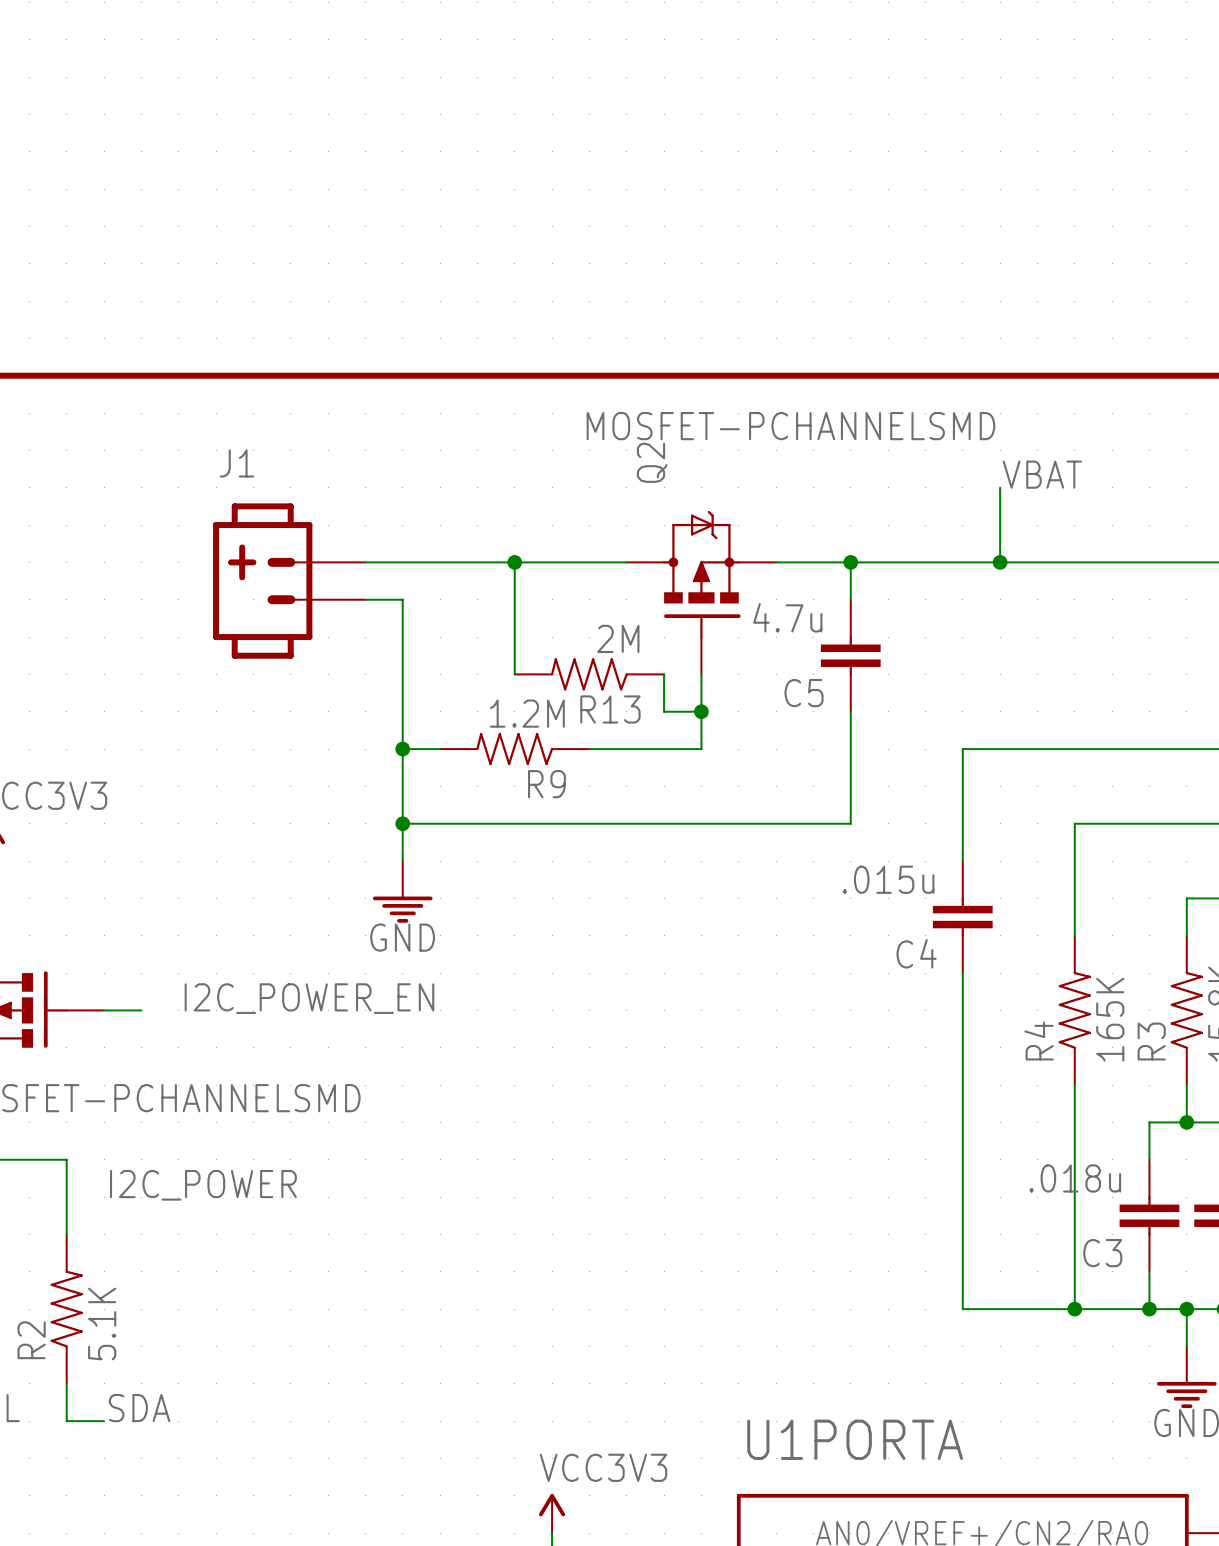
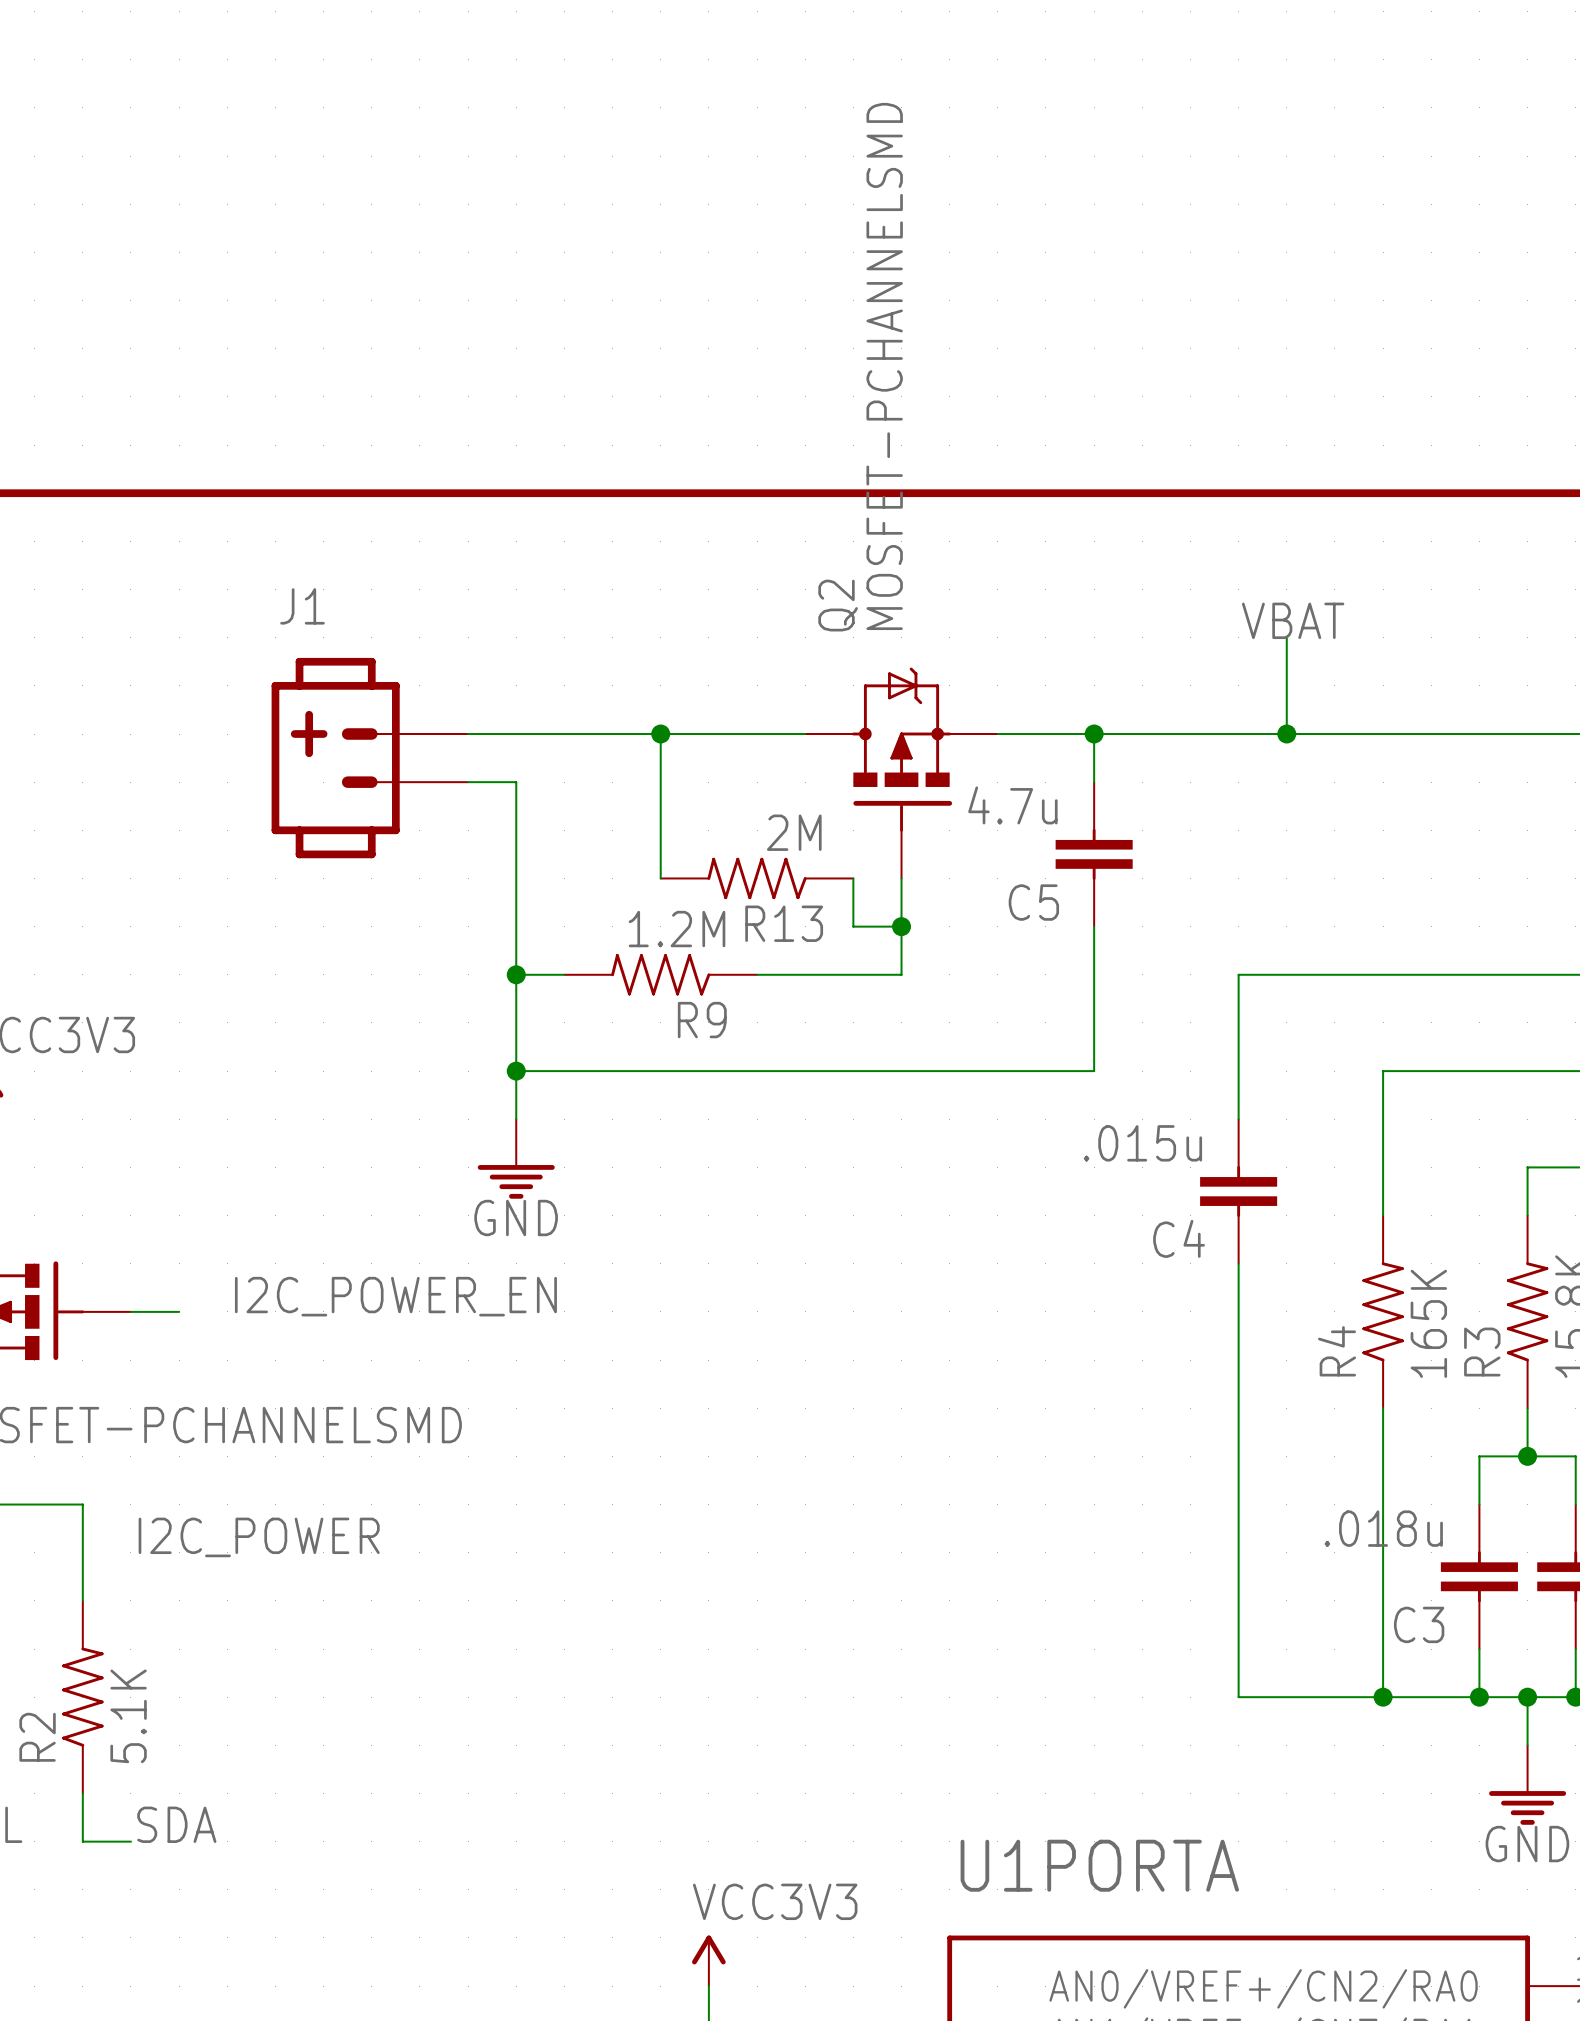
Q2 value rotation: 0° (790, 426) -> 90° counterclockwise (884, 366)
label position: VBAT (1042, 474) -> VBAT (1293, 620)

